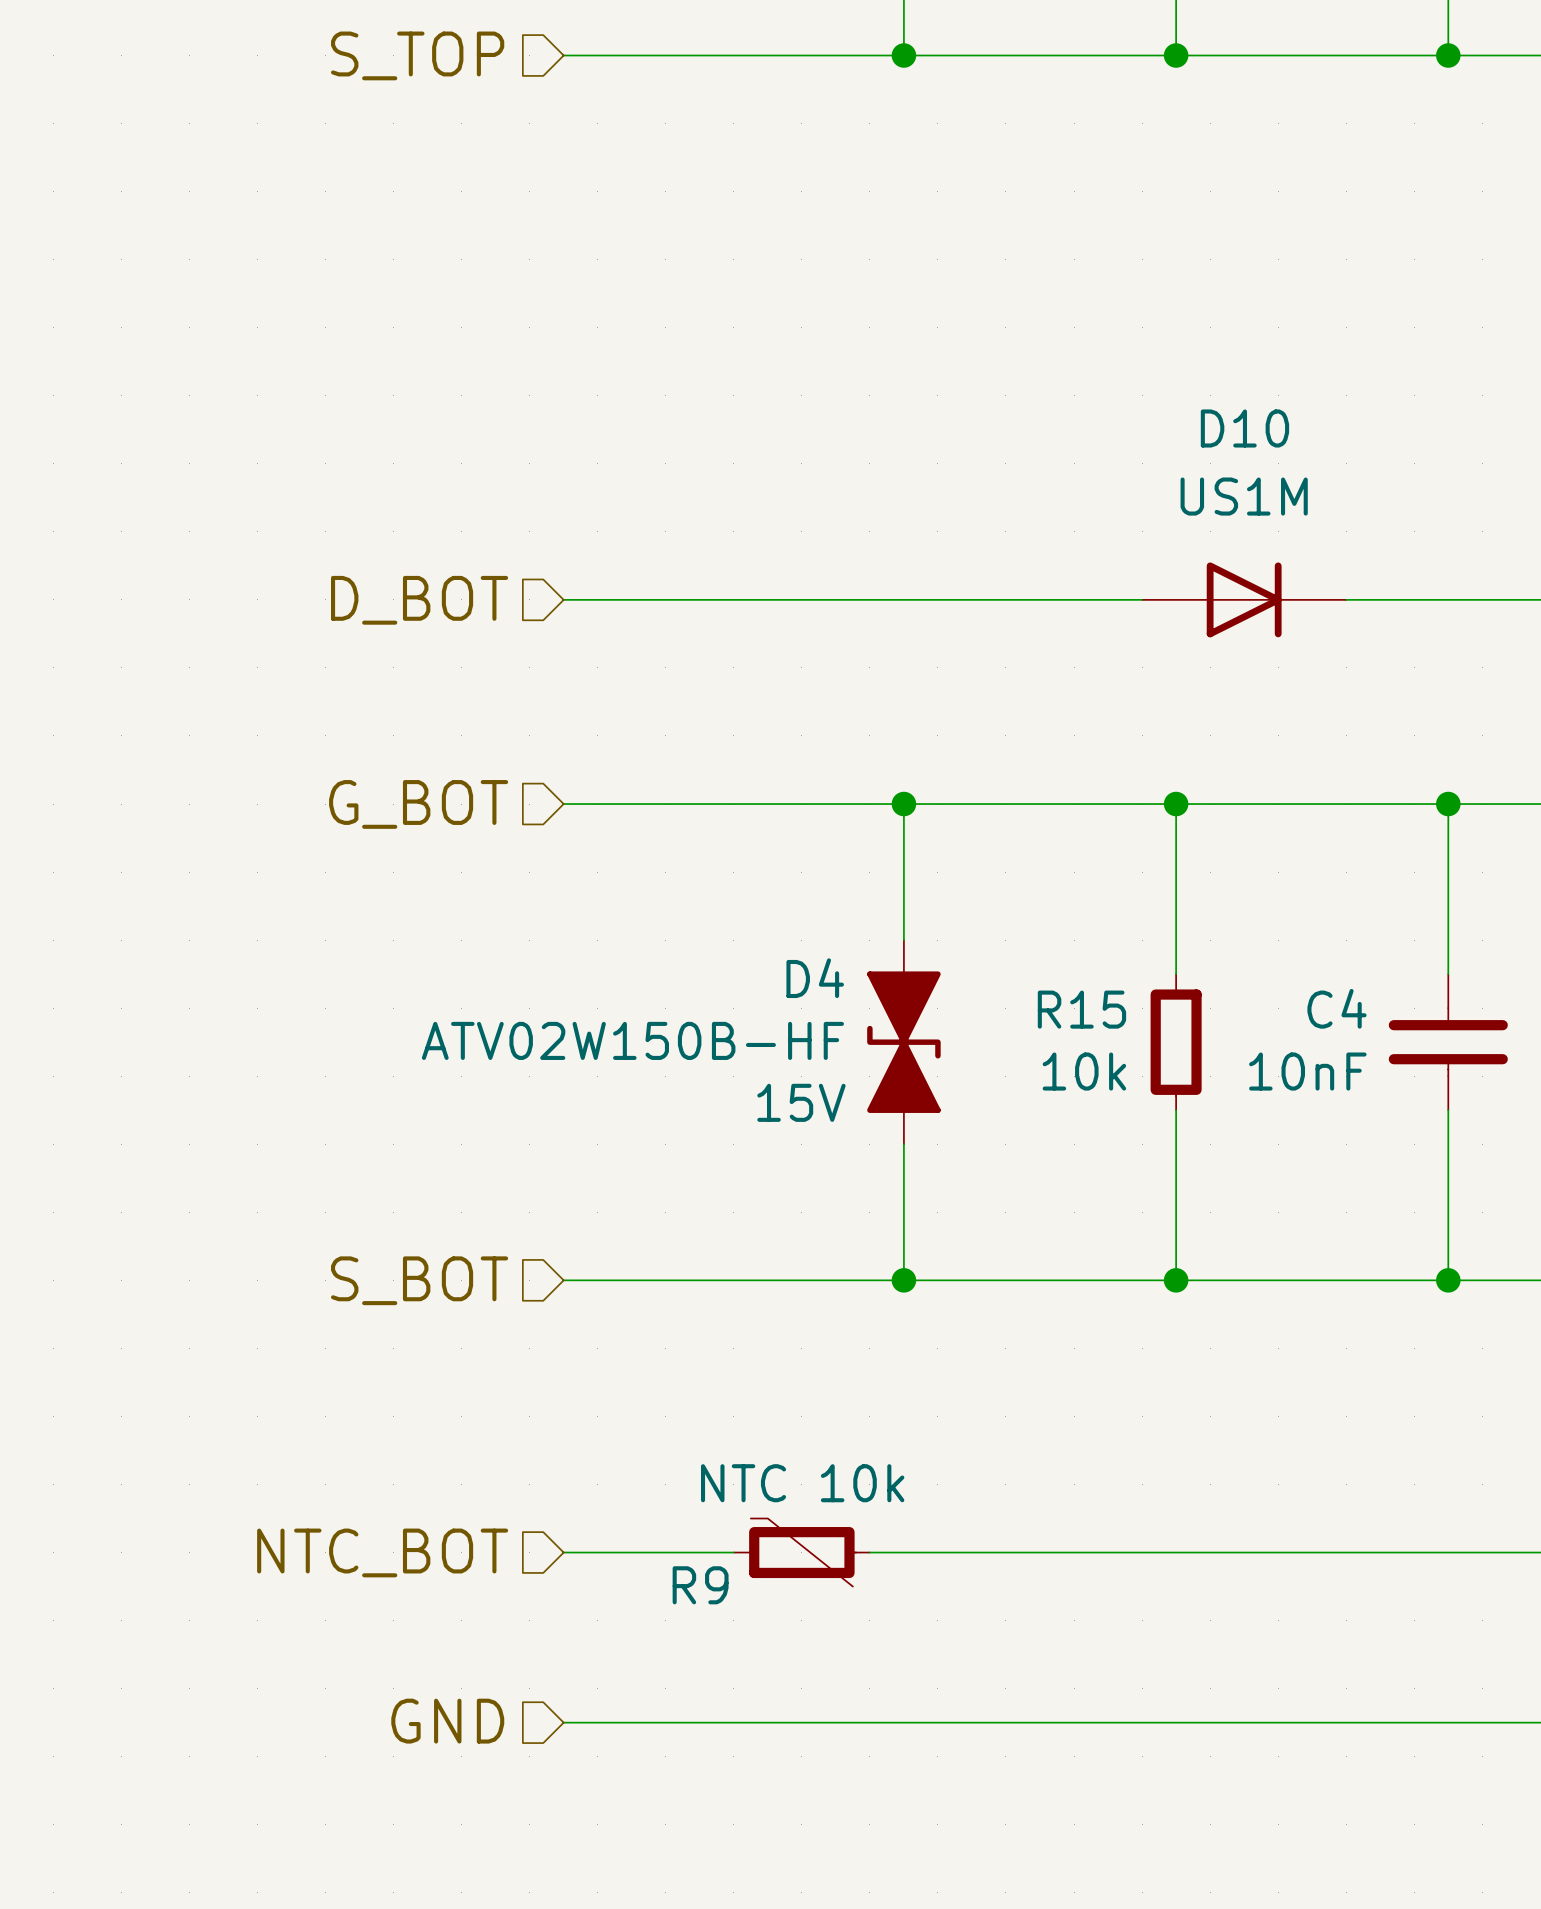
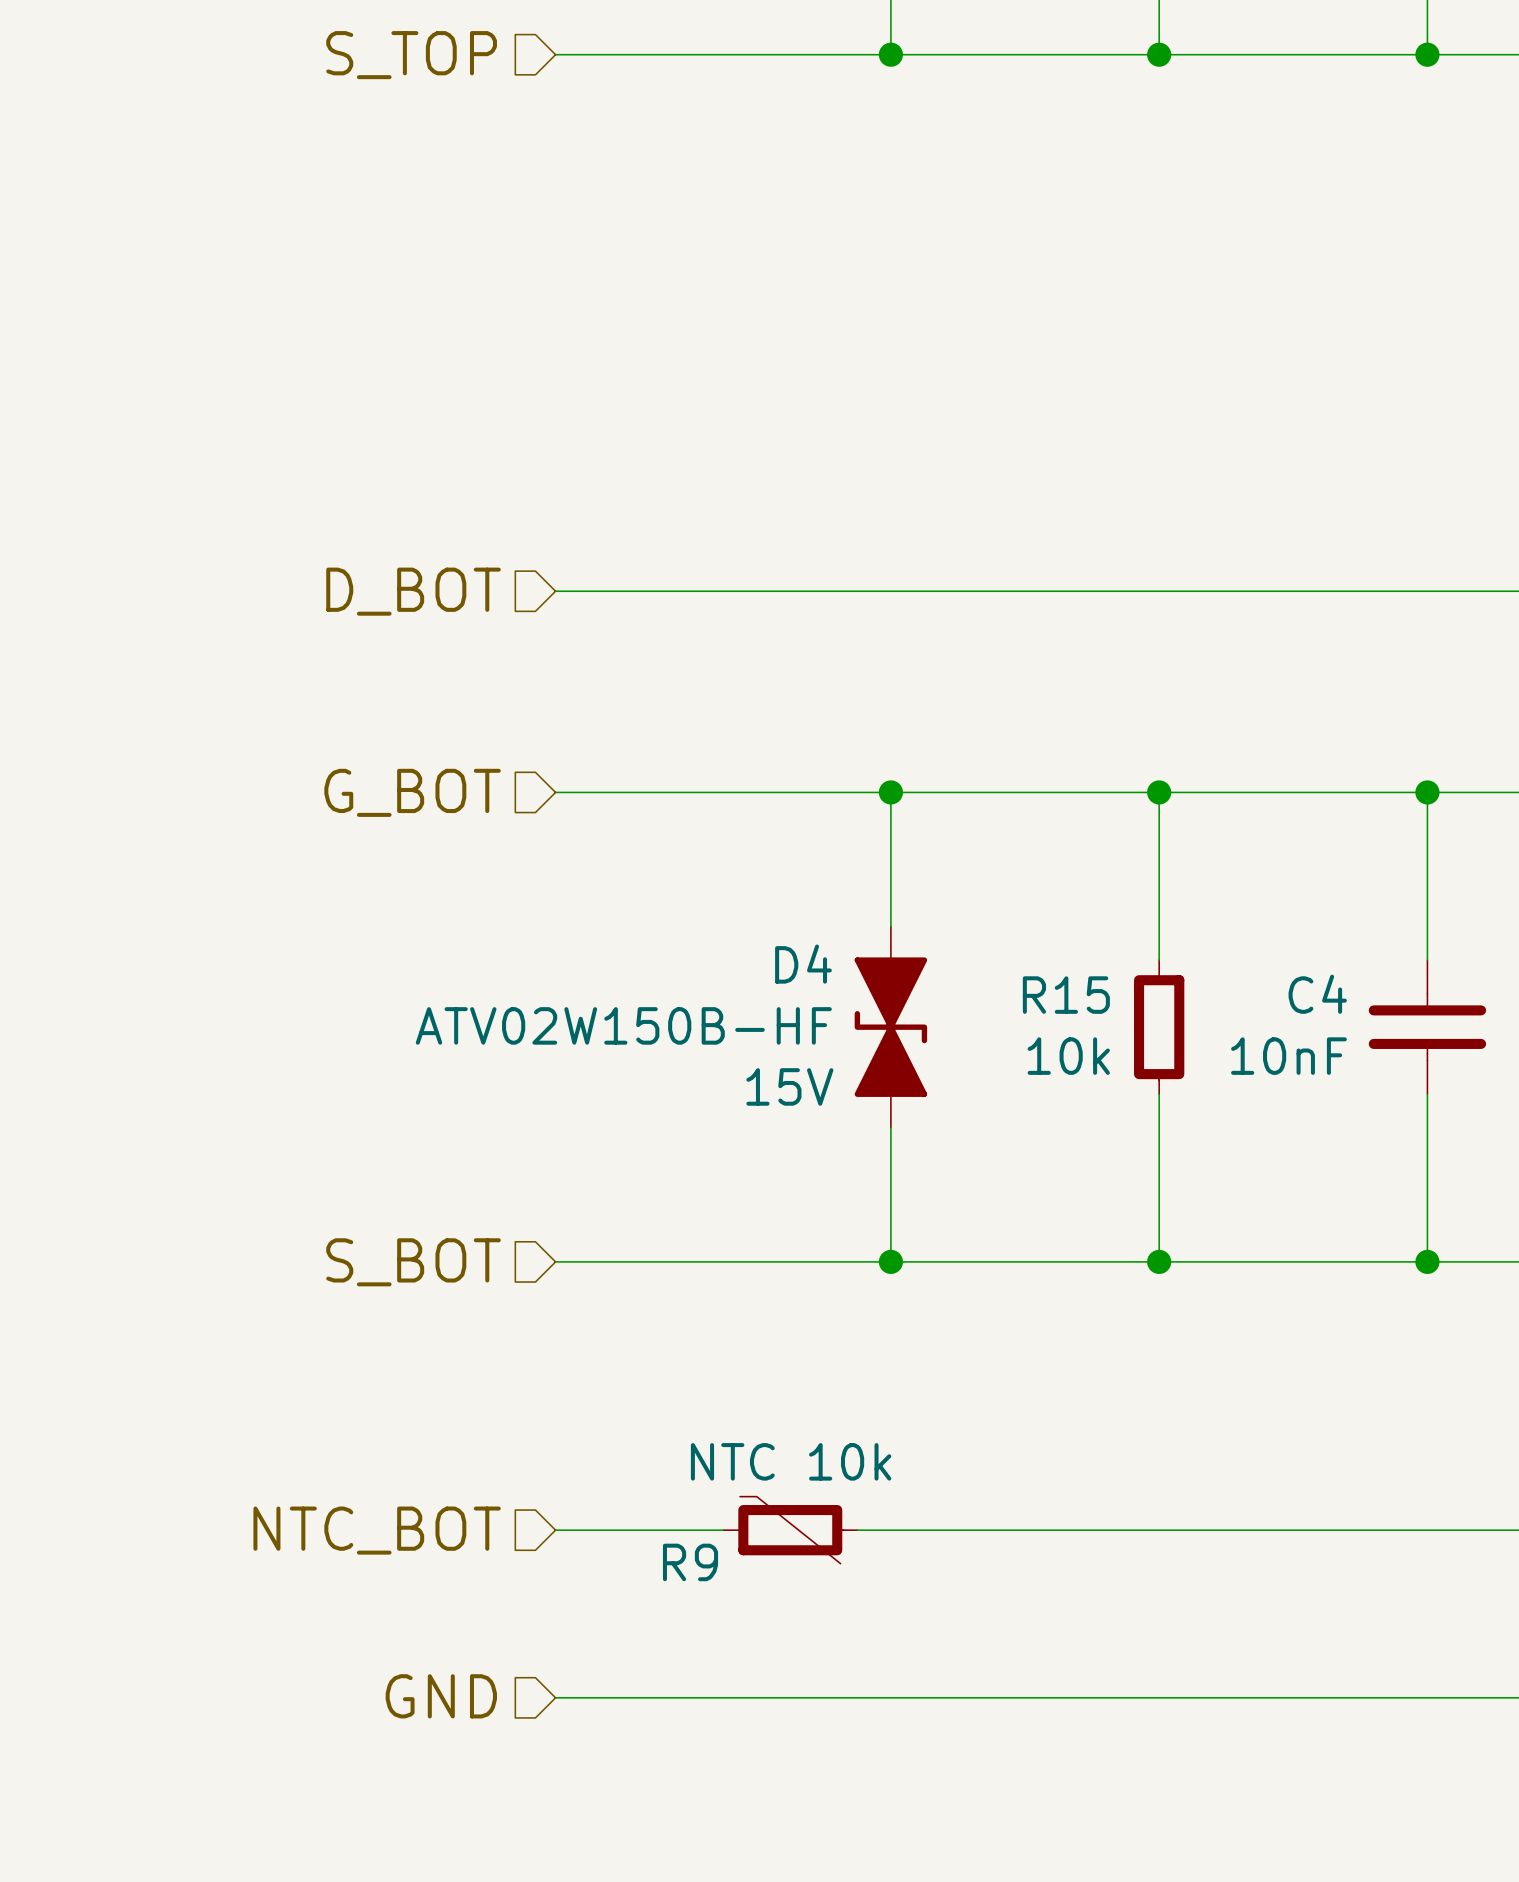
D10: US1M (1244, 599) -> none

